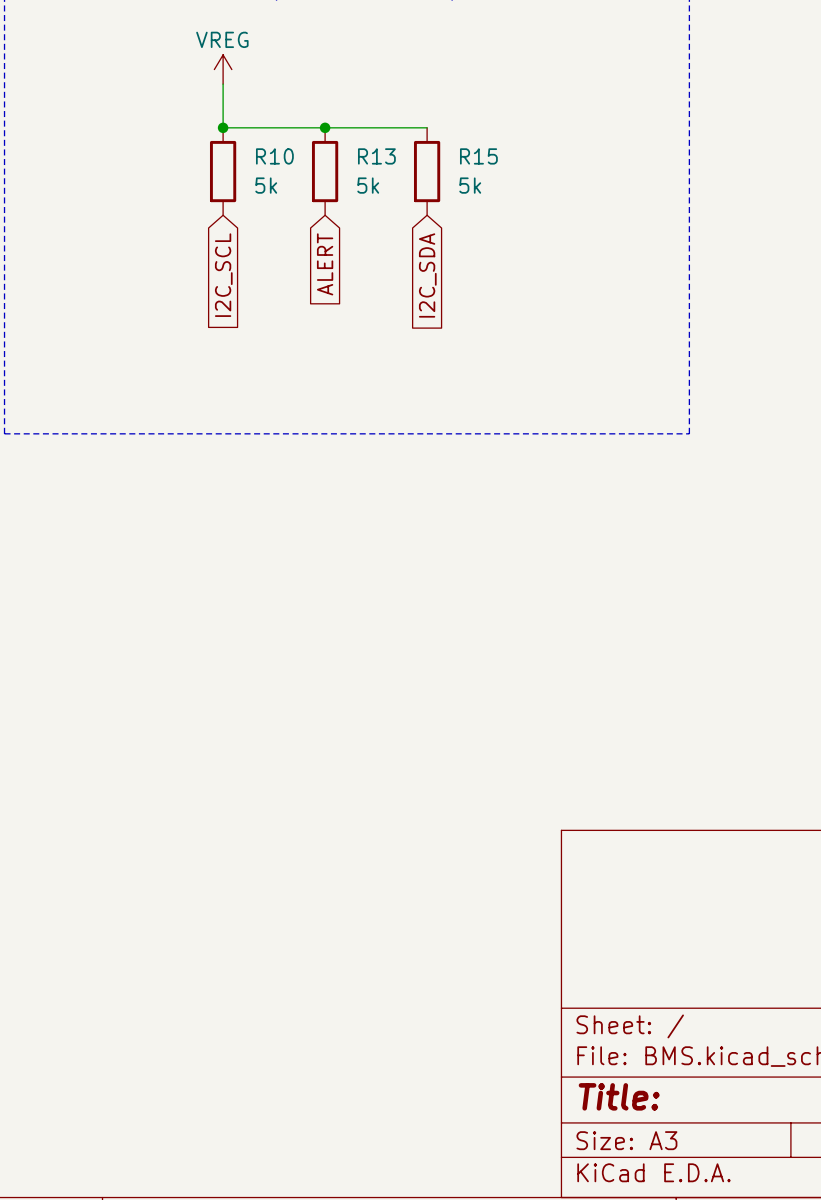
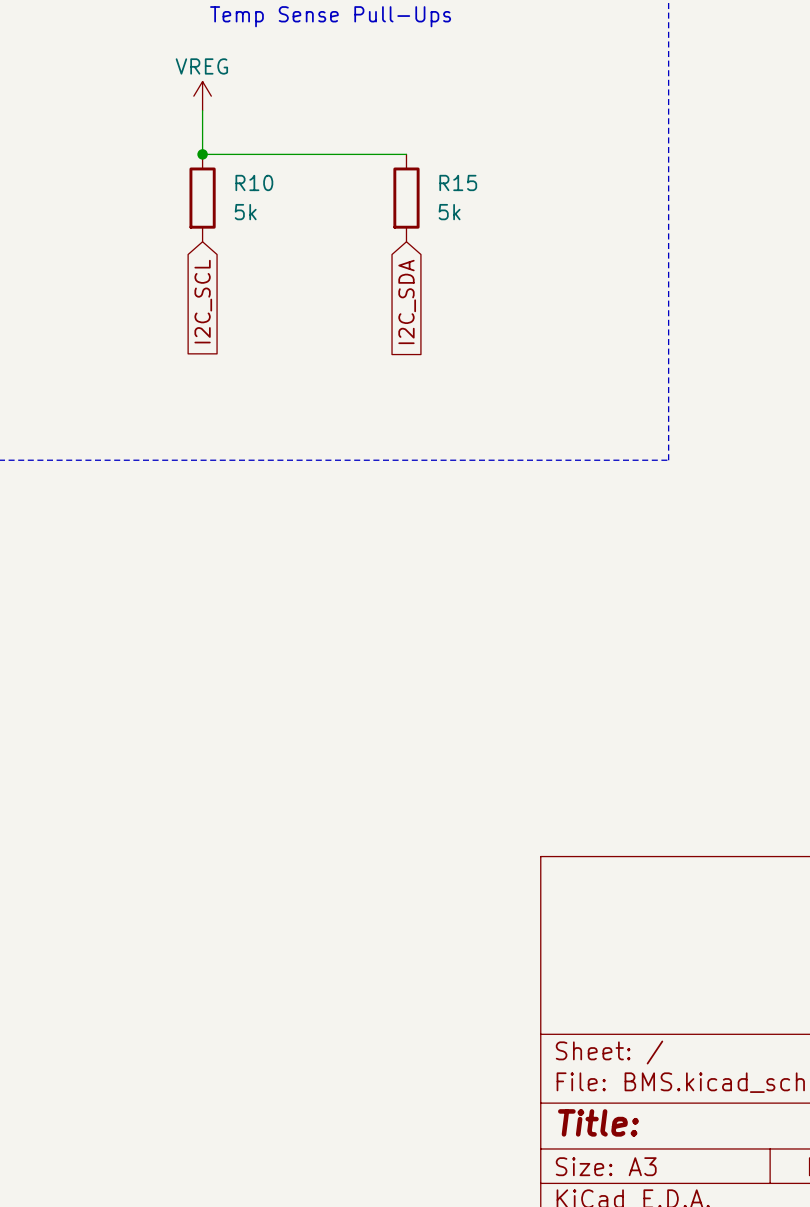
junction: (325, 127) -> none
R13: 5k (325, 171) -> none
global label: ALERT (325, 264) -> none

